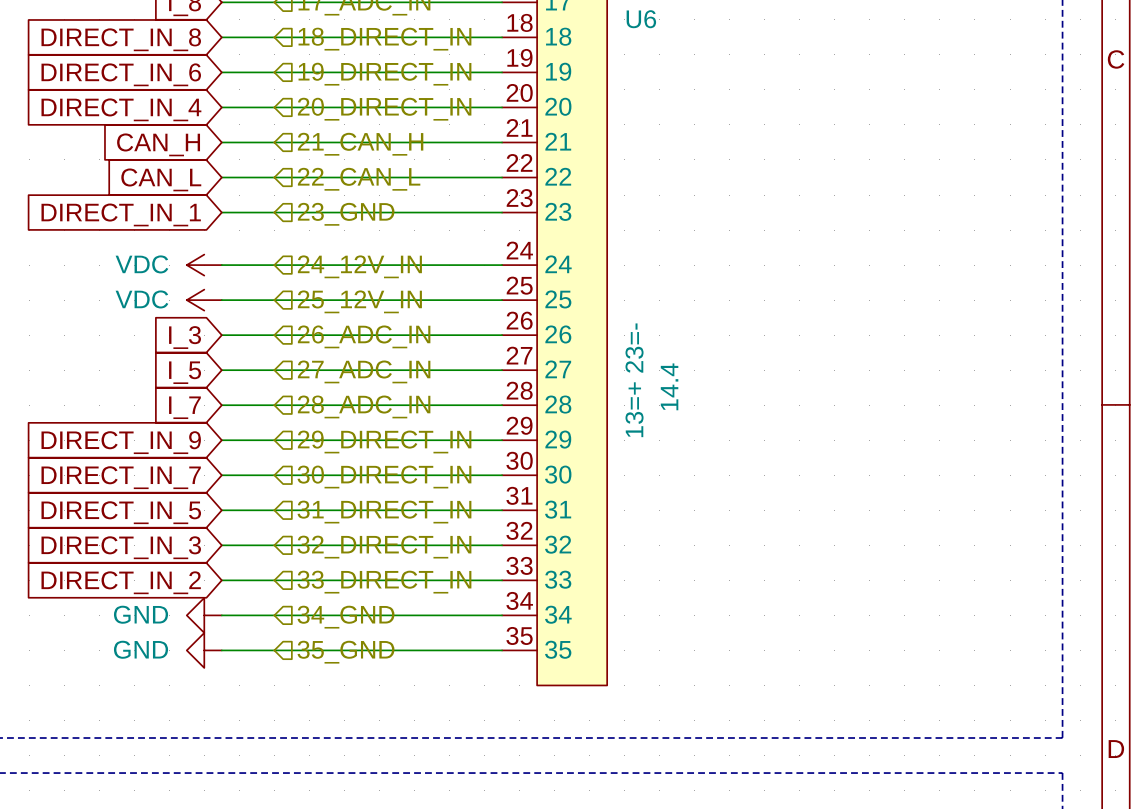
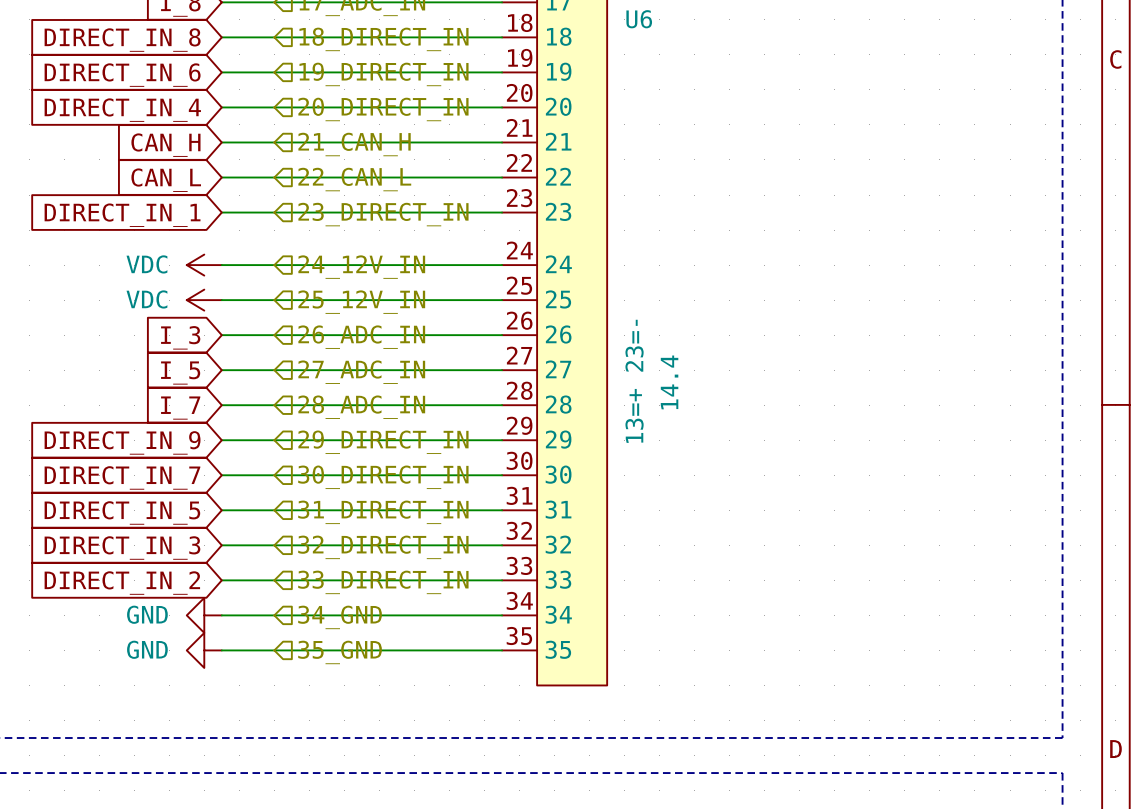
hierarchical label: 23_GND (346, 214) -> 23_DIRECT_IN (383, 214)

